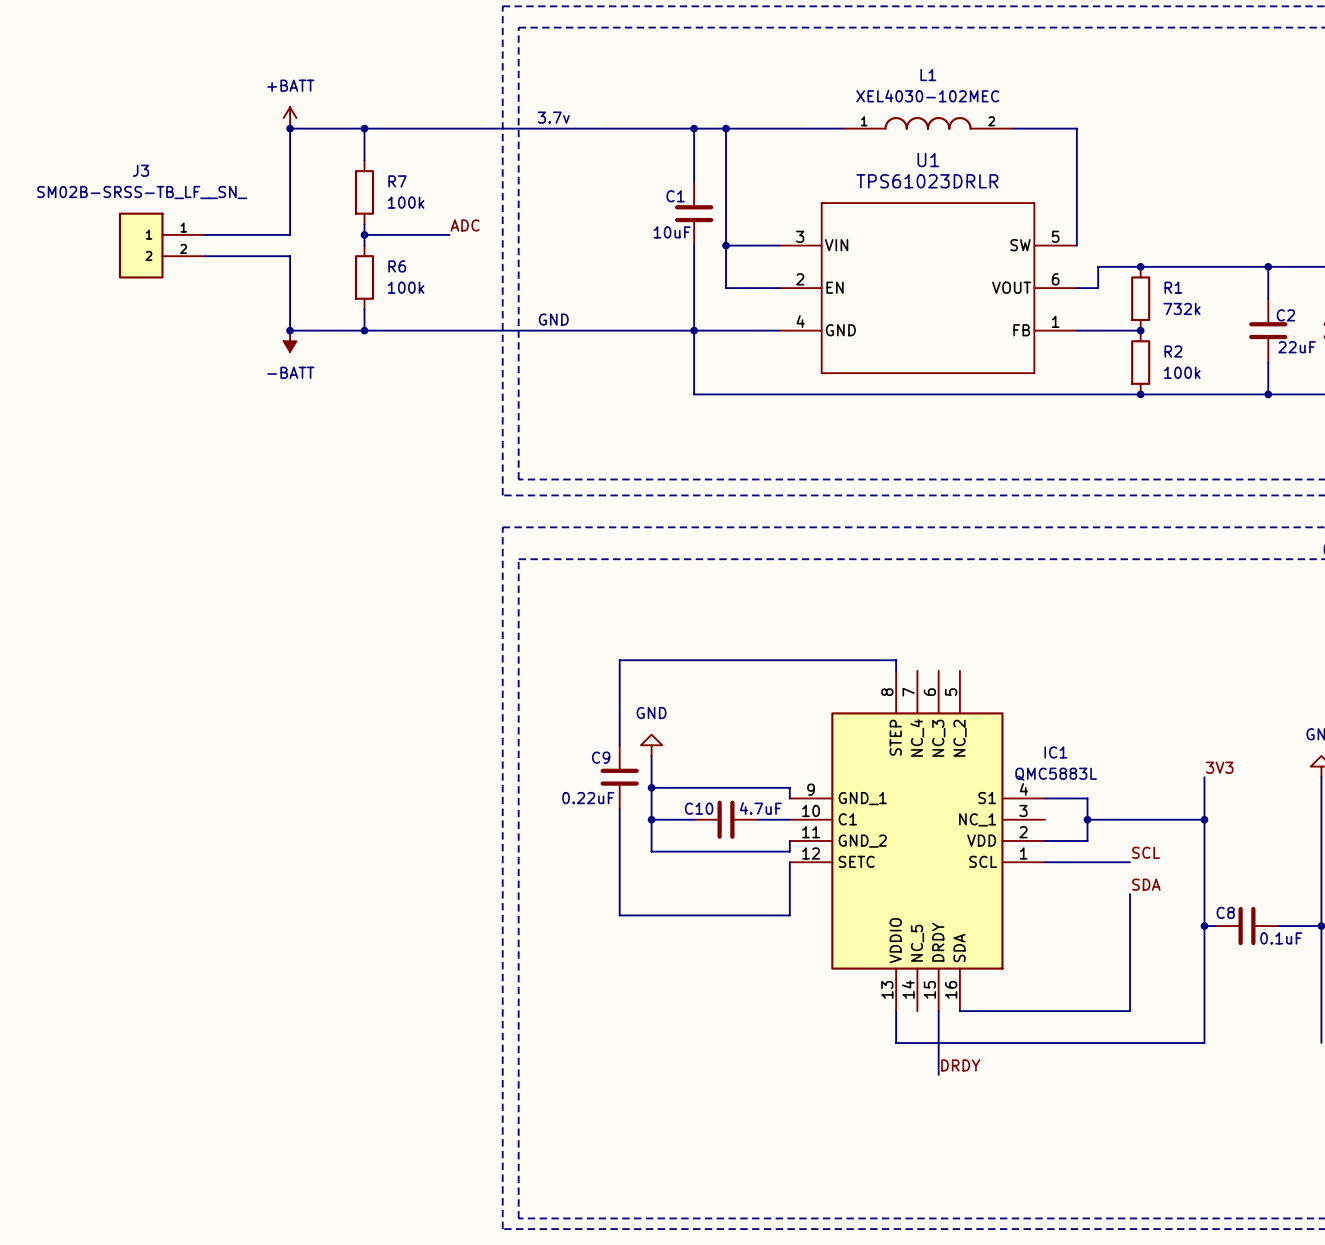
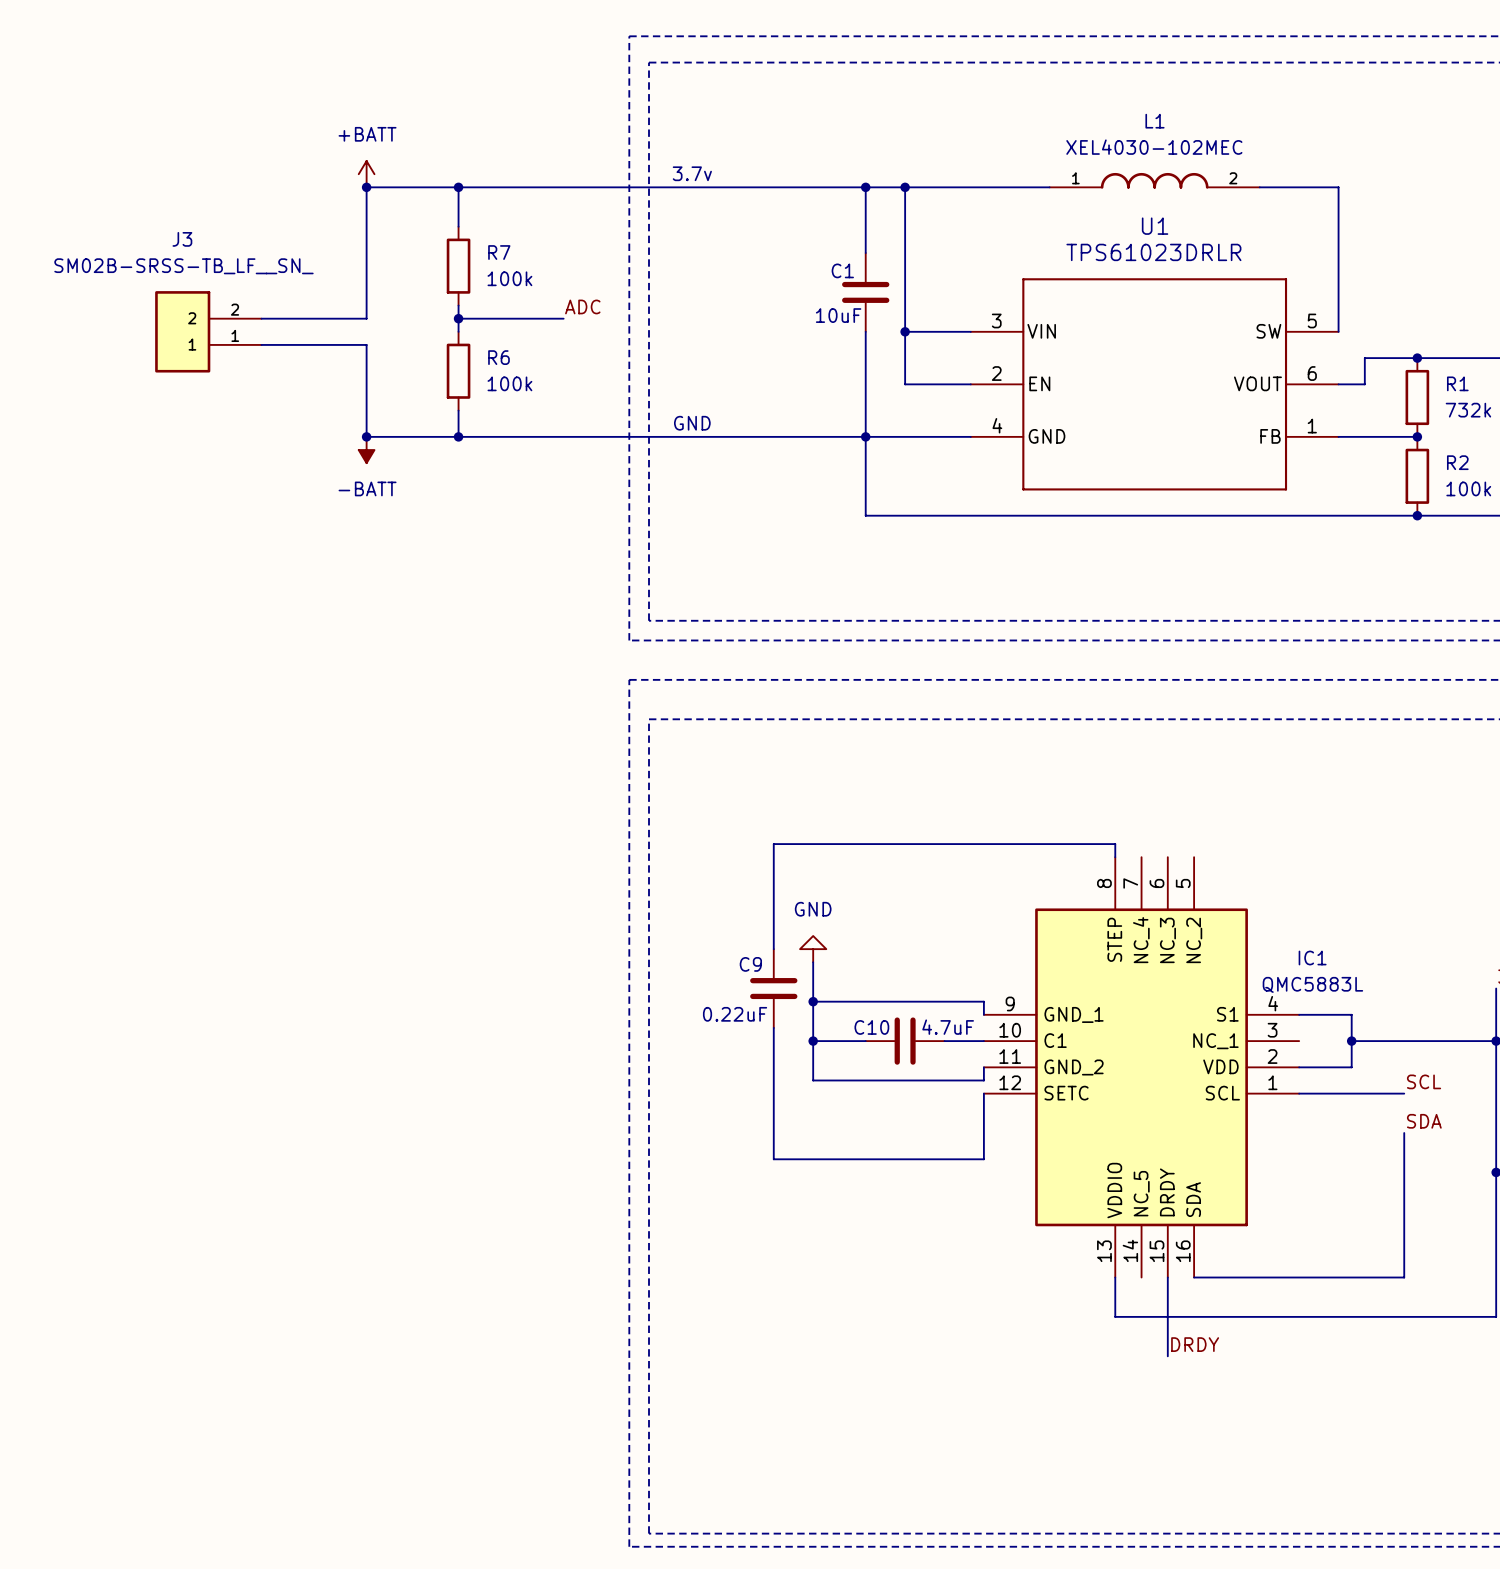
J3 flip: as is (141, 245) -> up-down (182, 331)

